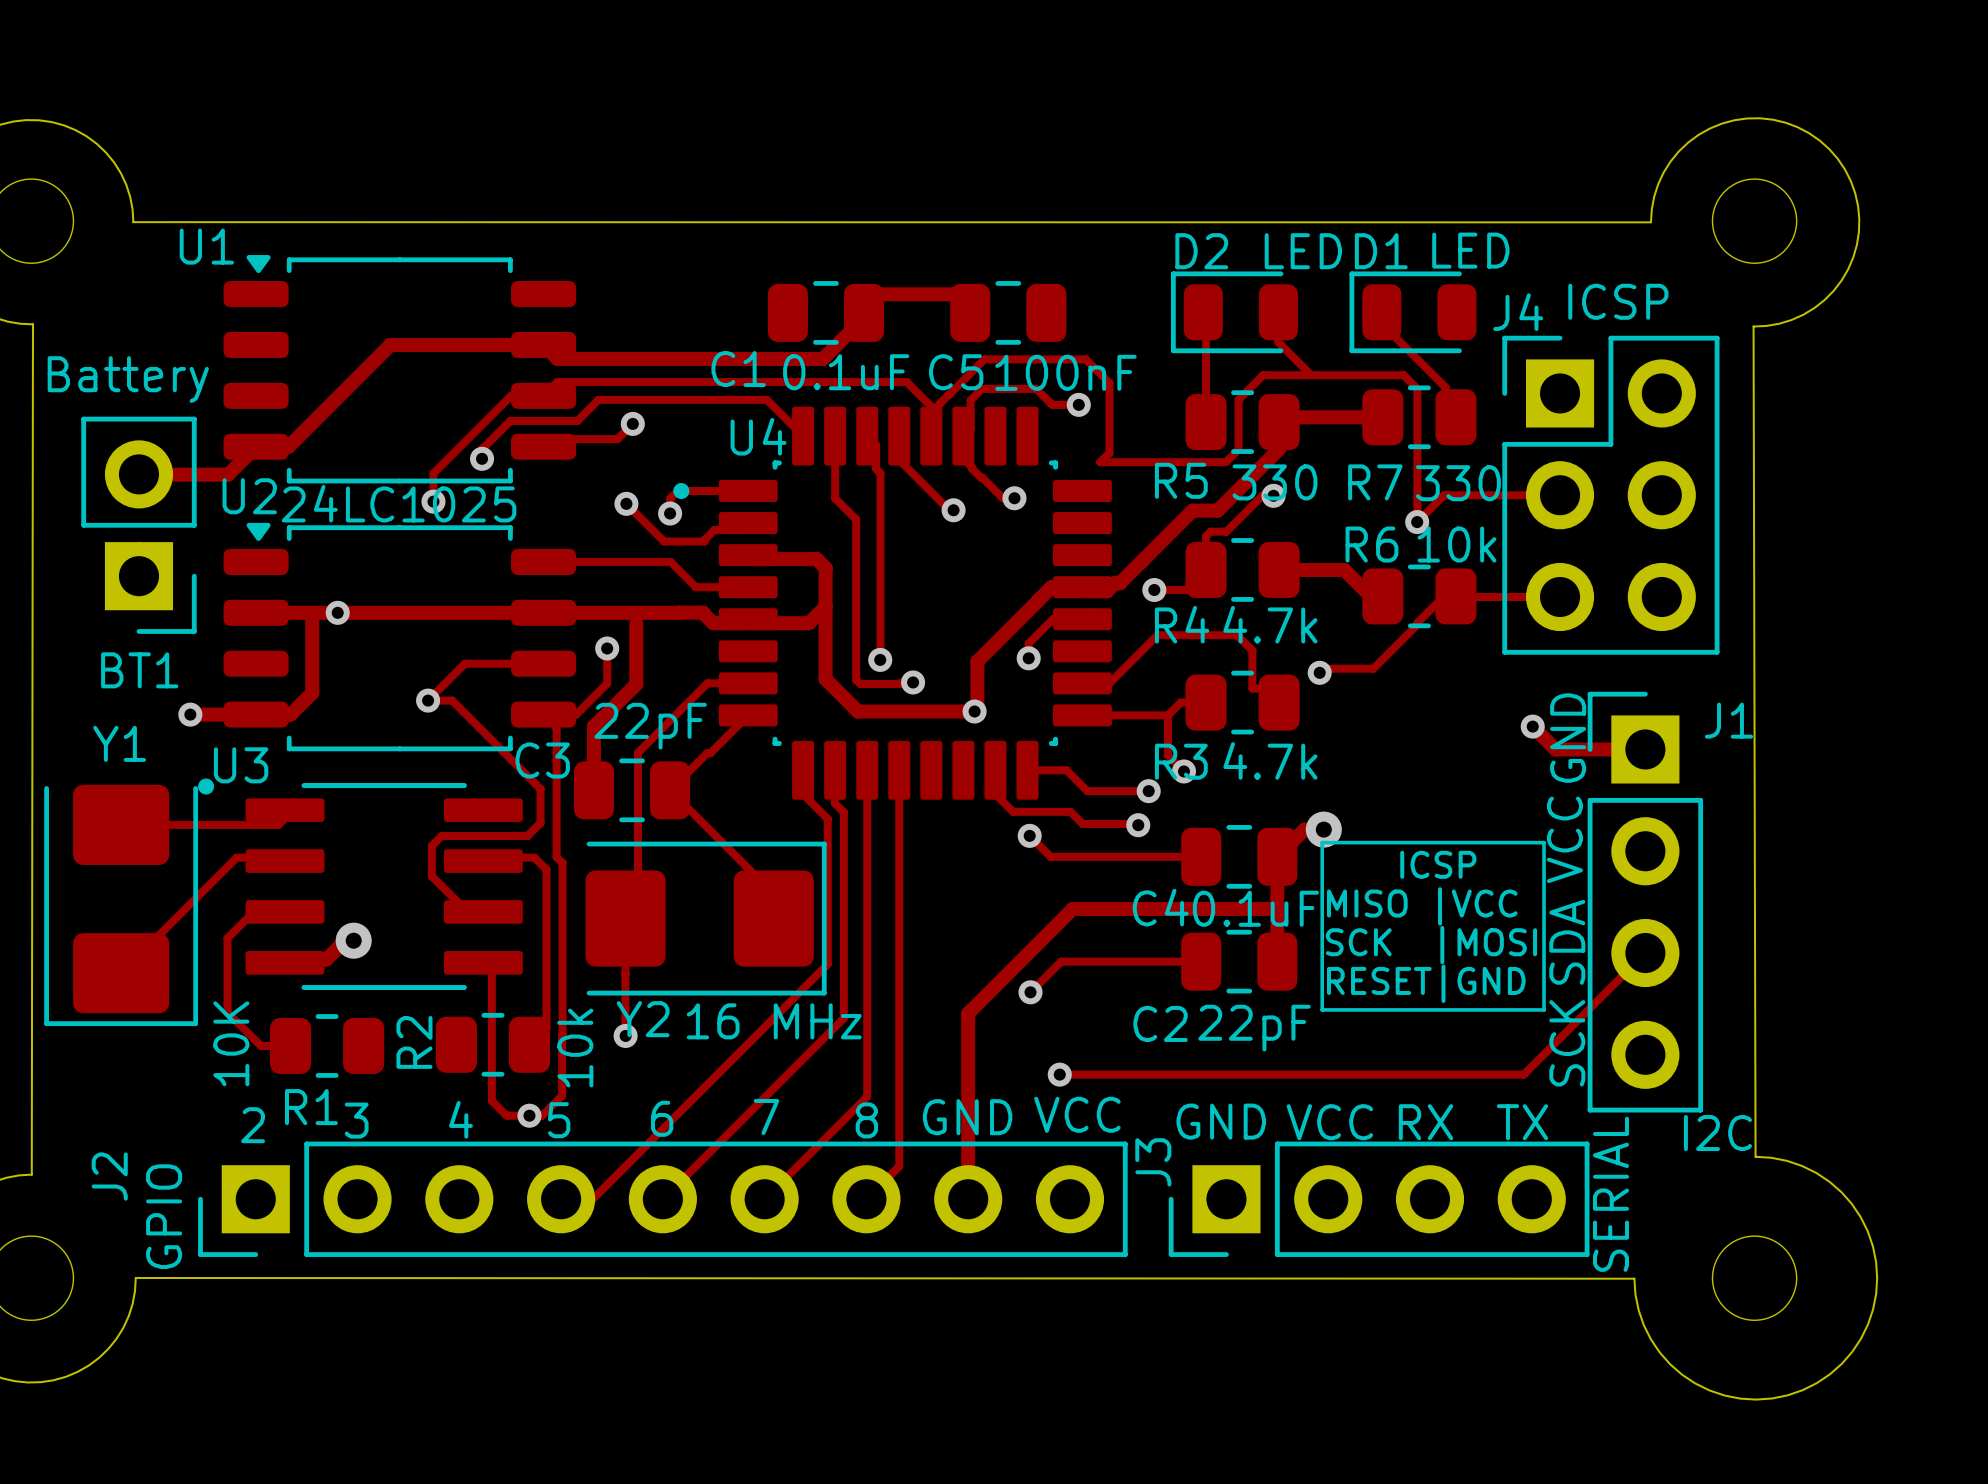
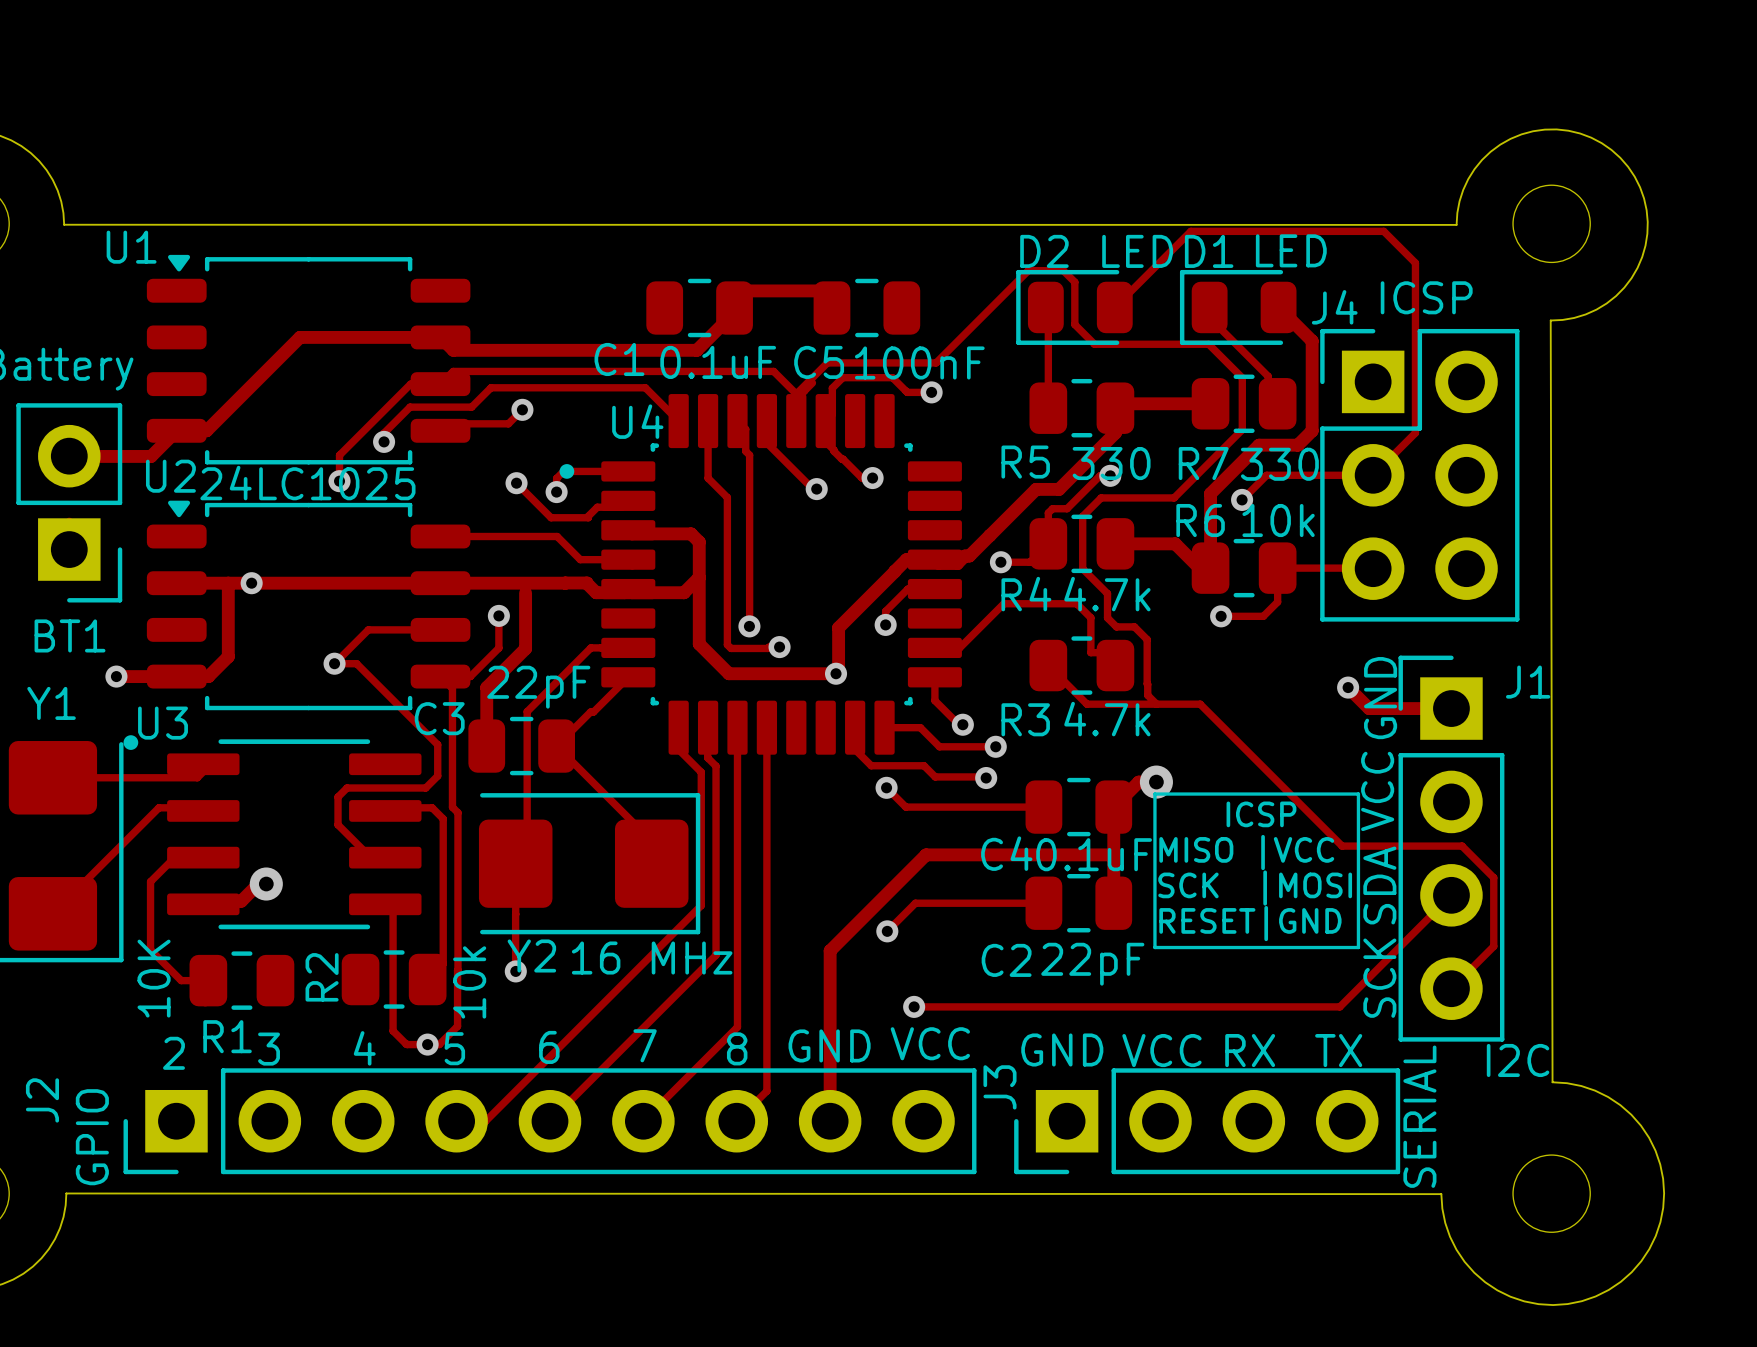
track: (1278, 312) (1278, 342) (1311, 375) -> (1114, 307) (1190, 231) (1383, 231) (1415, 263) (1415, 432) (1373, 475)
track: none -> (1278, 307) (1312, 341) (1312, 430) (1297, 445) (1259, 445) (1210, 493) (1210, 568)
track: (1403, 375) (1263, 375) (1238, 399) (1238, 449) (1225, 462) (1100, 462) (1109, 453) (1109, 383) (1085, 359) (984, 359) (949, 394) -> (1229, 365) (1208, 344) (1094, 344) (1074, 324) (1074, 282) (1063, 270) (1028, 270) (936, 362) (827, 362) (796, 394)
track: (1417, 445) (1417, 521) -> (1242, 429) (1174, 497) (1101, 497) (1082, 516) (1082, 568) (1107, 593) (1107, 617) (1116, 626) (1134, 626) (1147, 639) (1147, 695) (1156, 704)
track: (1560, 597) (1443, 596) (1373, 668) (1325, 668) (1319, 672) -> (1373, 568) (1277, 568) (1277, 602) (1263, 616) (1221, 616)
via position: (1319, 672) -> (1221, 616)
track: (1206, 702) (1180, 702) (1167, 715) -> (1048, 665) (1086, 704) (1200, 704) (1342, 846) (1462, 846) (1493, 877) (1493, 946) (1451, 988)
track: (1082, 715) (1167, 715) -> (934, 677) (934, 700) (959, 724) (962, 724)
track: (1167, 715) (1167, 755) (1183, 771) -> none
via position: (1183, 771) -> (962, 724)

